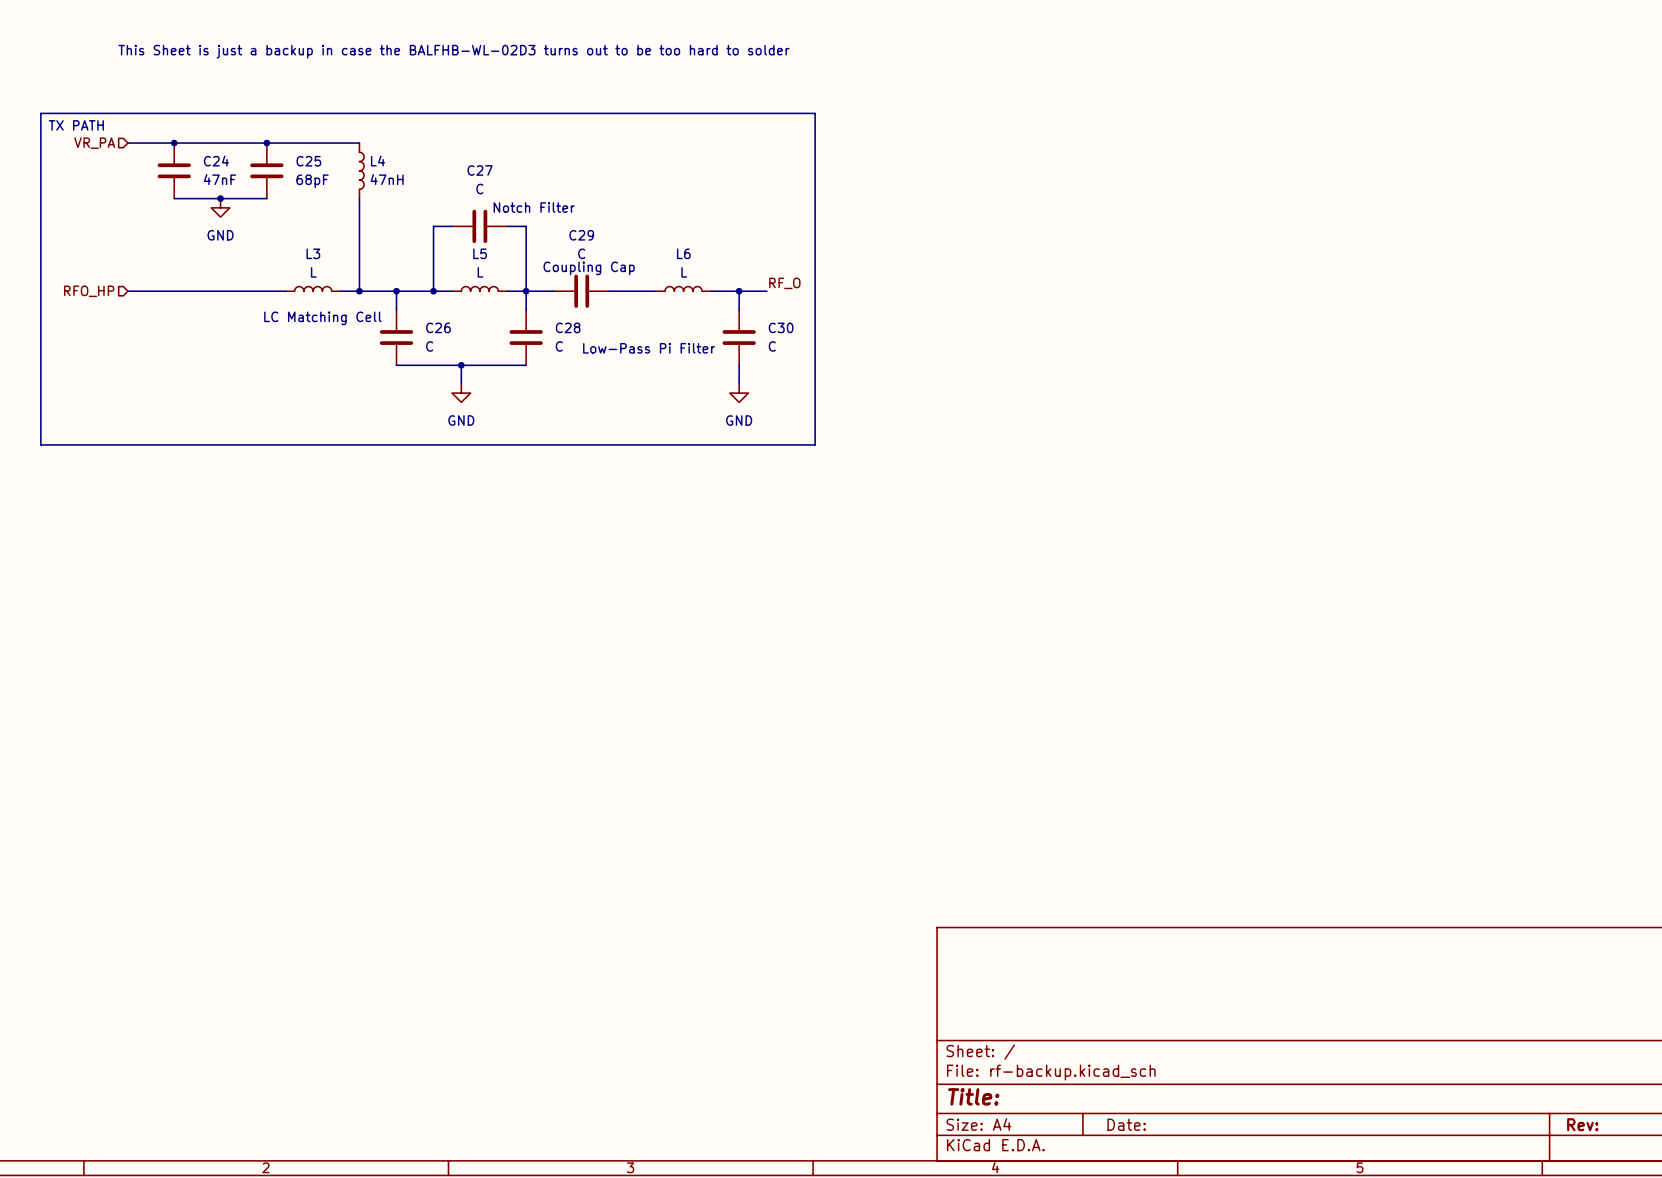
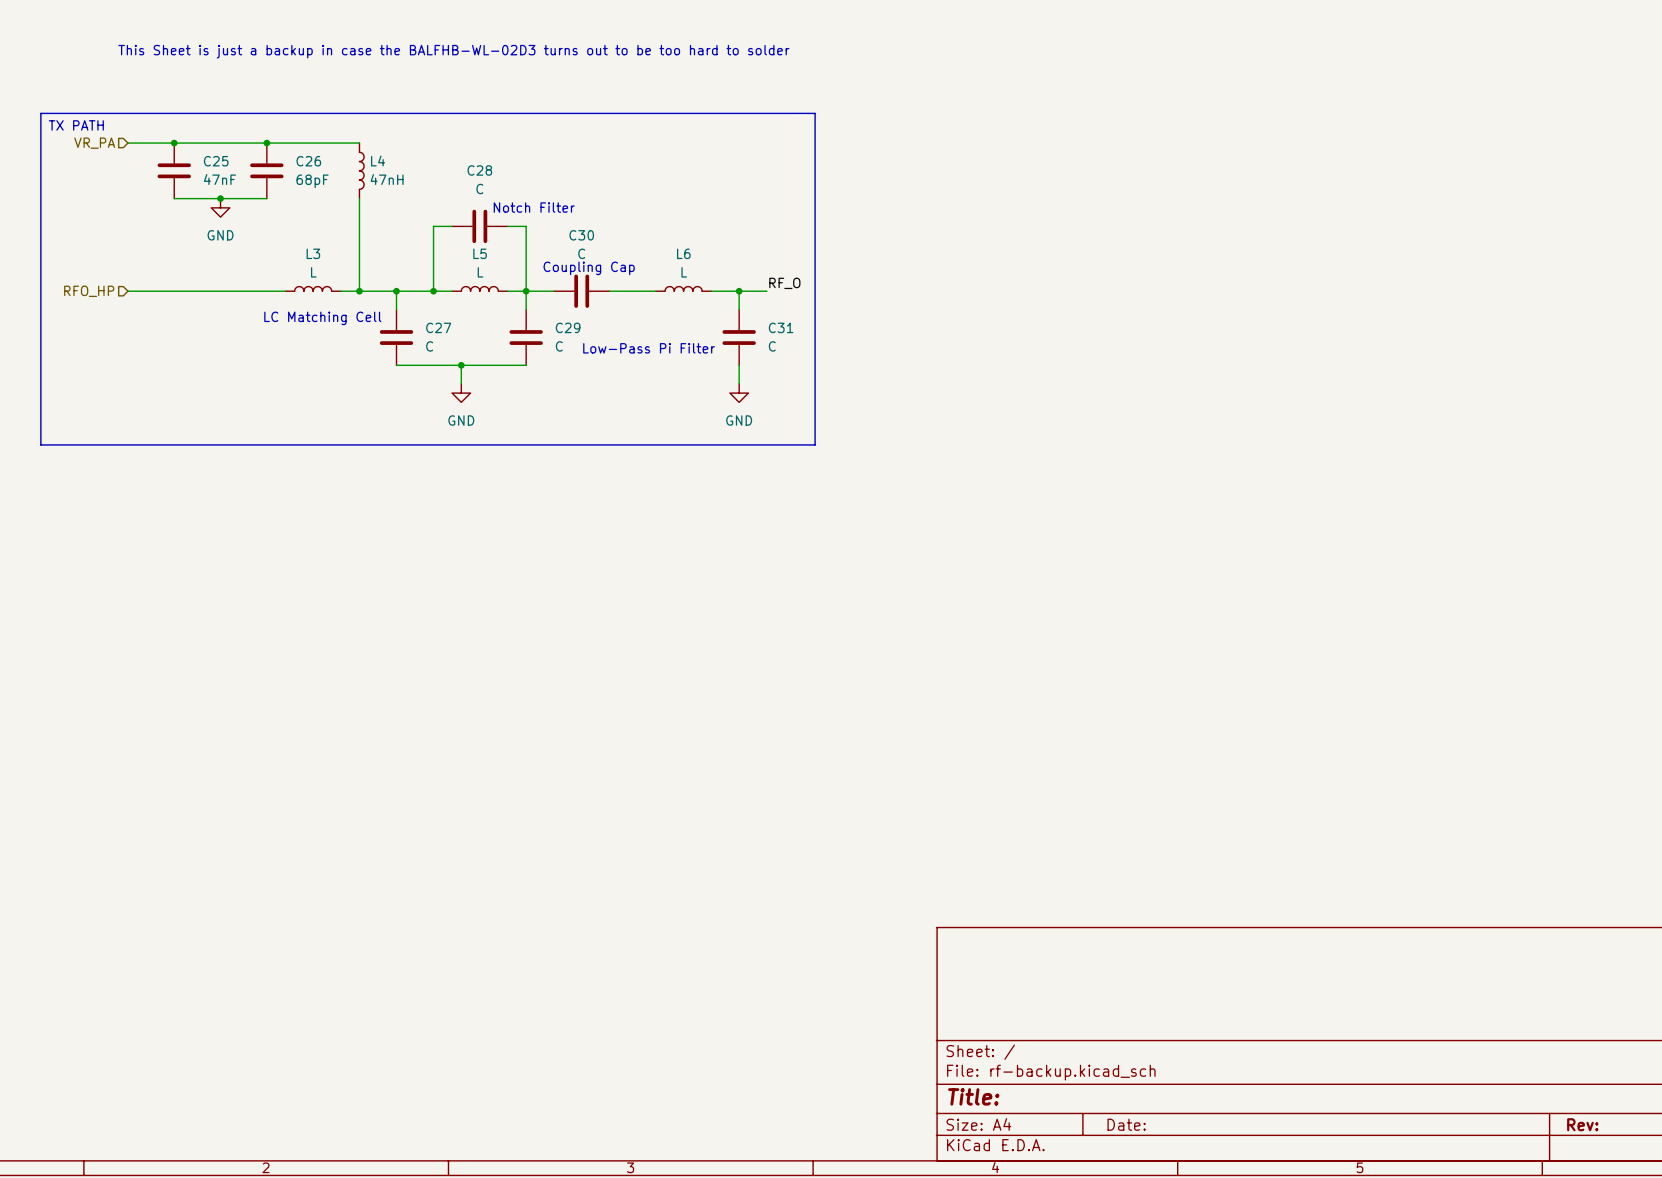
C24 name: C24 (216, 161) -> C25 (216, 161)
C25 name: C25 (308, 161) -> C26 (308, 161)
C27 name: C27 (480, 170) -> C28 (479, 170)
C29 name: C29 (581, 235) -> C30 (581, 235)
C26 name: C26 (438, 327) -> C27 (438, 327)
C28 name: C28 (568, 327) -> C29 (568, 327)
C30 name: C30 (781, 327) -> C31 (781, 327)

